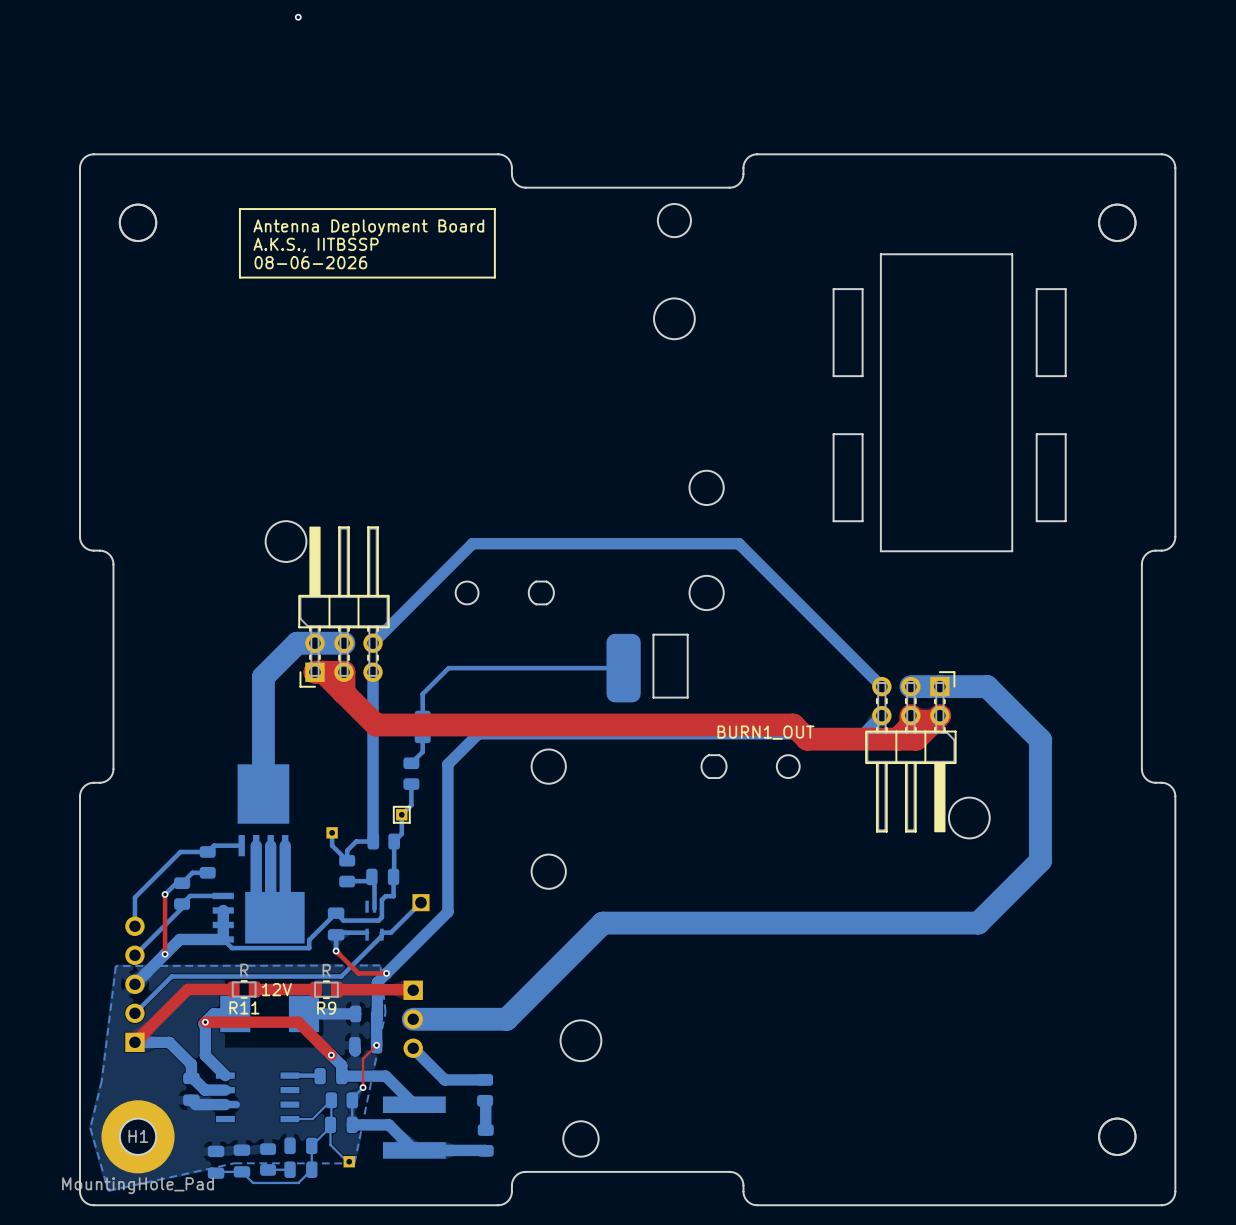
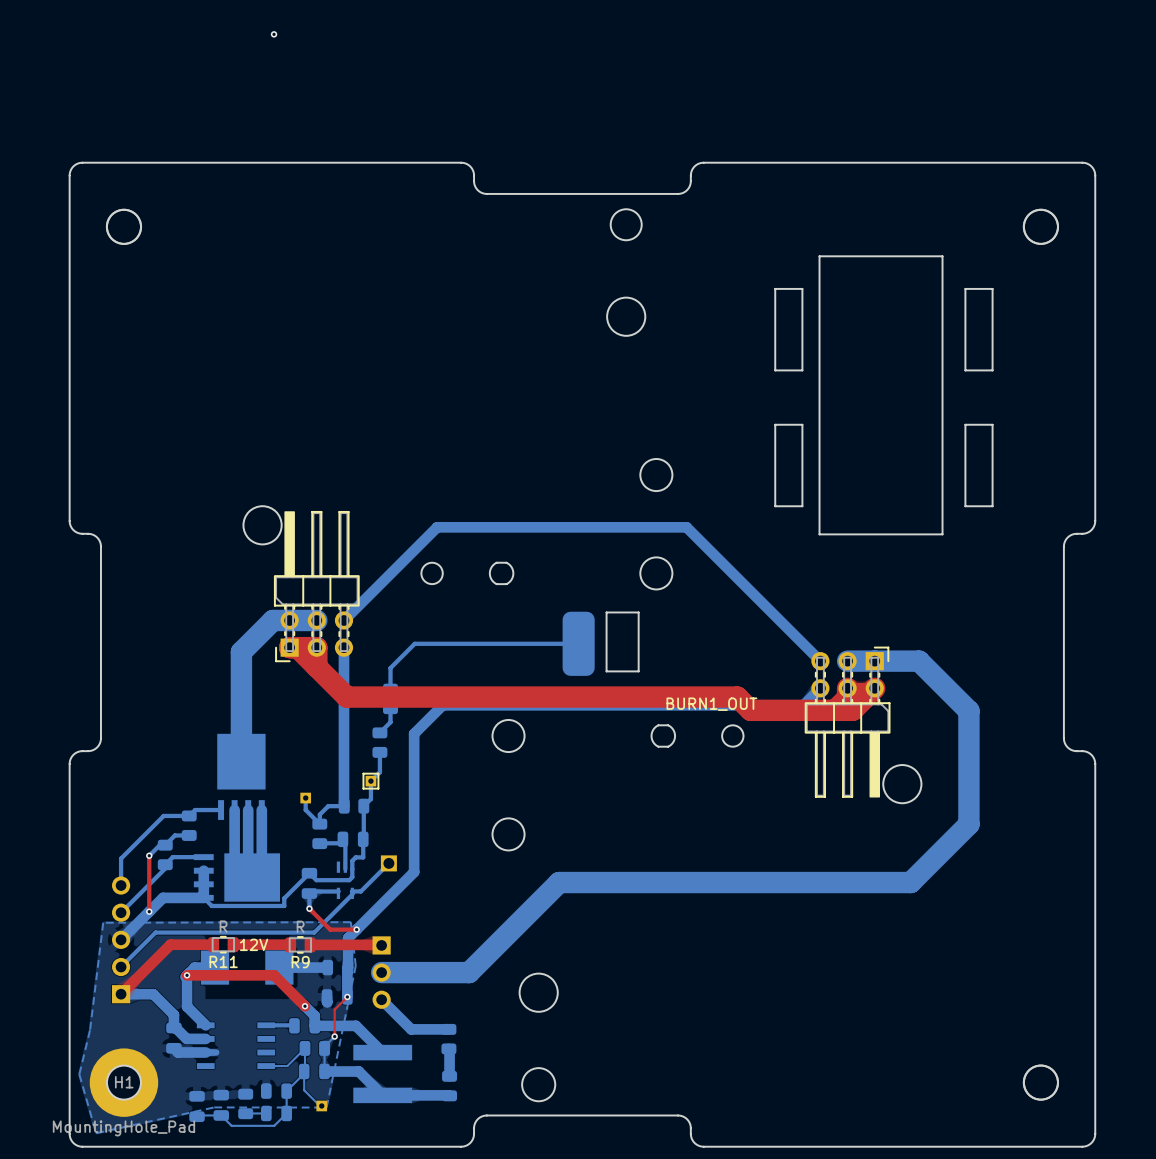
line: (239, 209) (494, 209) (494, 277) (239, 277) (239, 209) -> none
text: Antenna Deployment Board (368, 227) -> none
text: A.K.S., IITBSSP (316, 245) -> none
text: 08-06-2026 (310, 262) -> none

